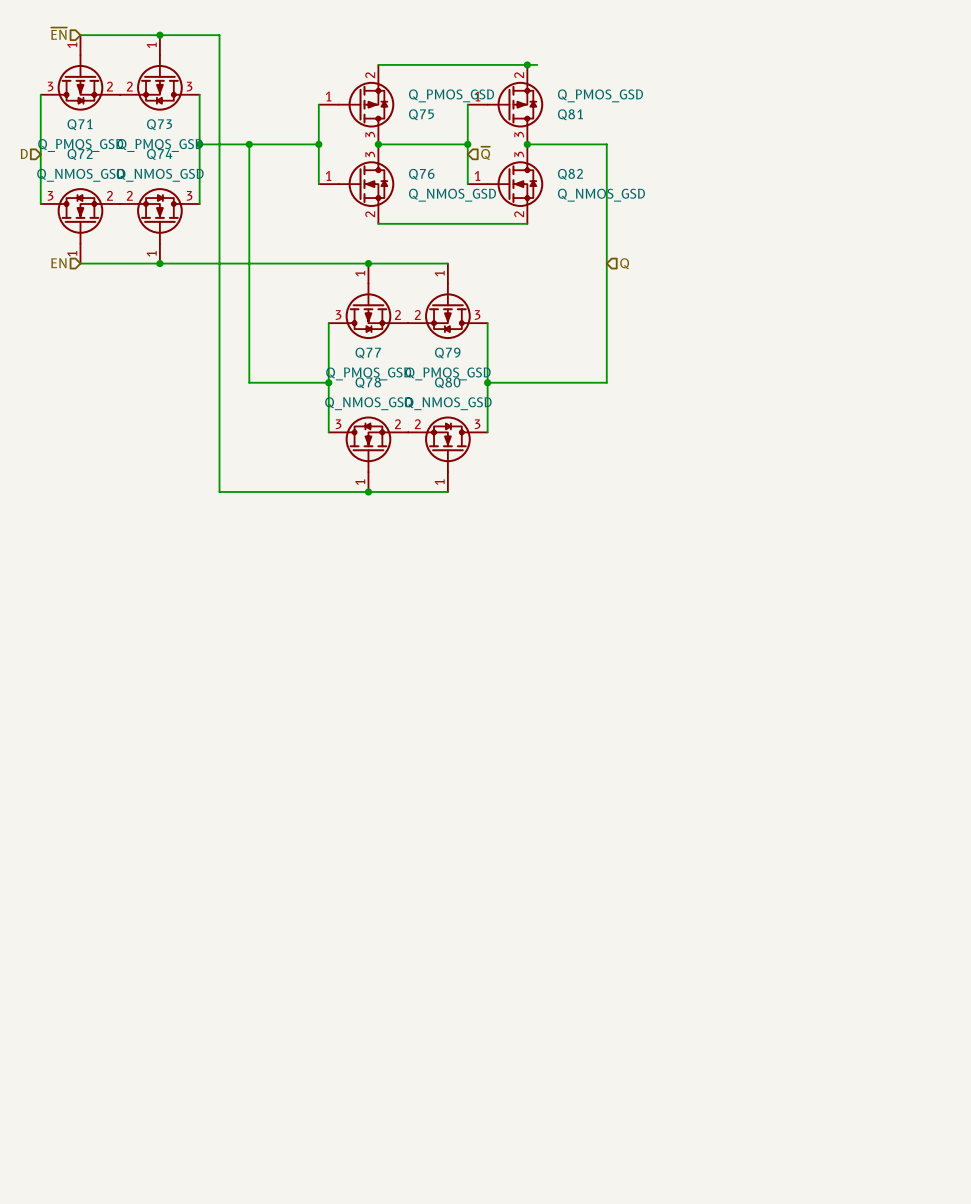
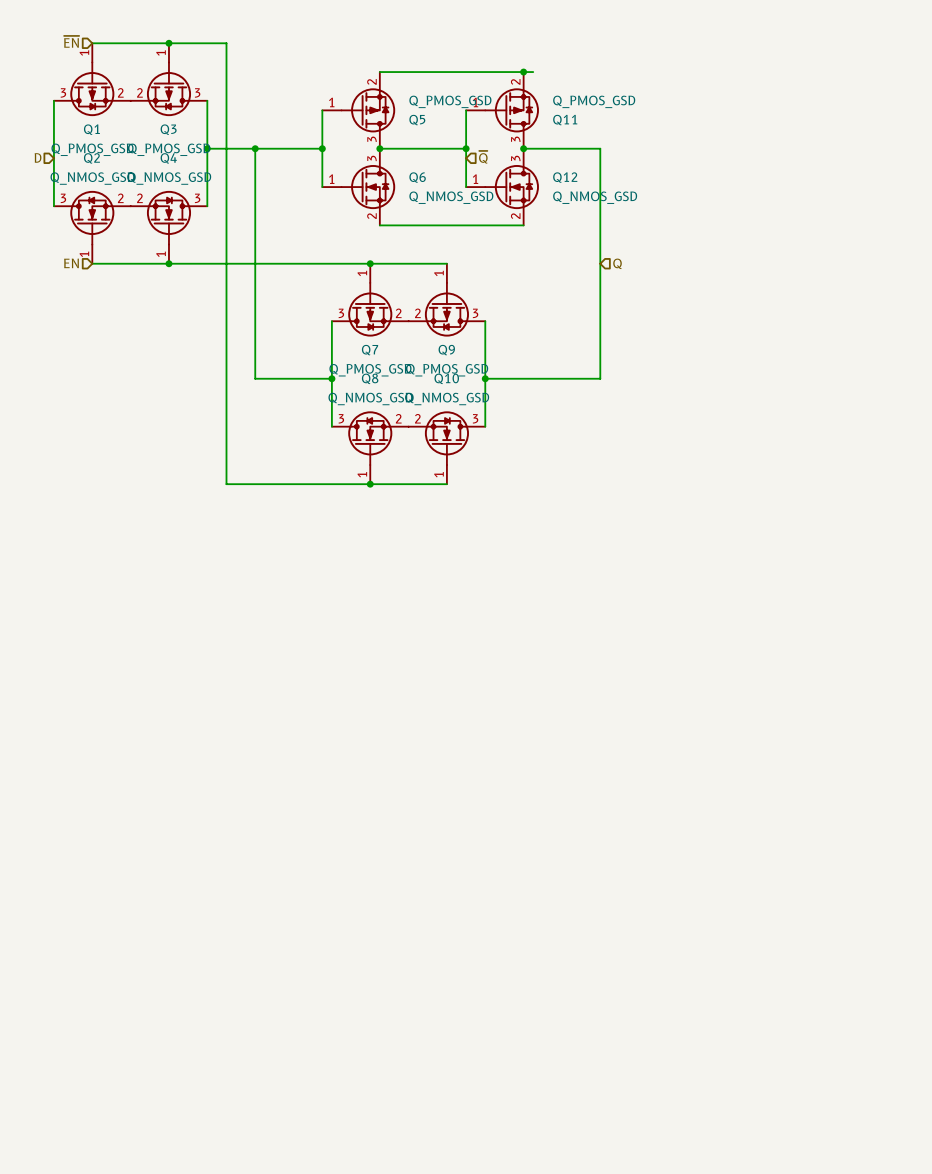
Q75 name: Q75 (421, 114) -> Q5 (417, 120)
Q81 name: Q81 (570, 114) -> Q11 (565, 120)
Q71 name: Q71 (80, 124) -> Q1 (91, 129)
Q73 name: Q73 (159, 124) -> Q3 (168, 129)
Q72 name: Q72 (80, 154) -> Q2 (91, 158)
Q74 name: Q74 (159, 154) -> Q4 (168, 158)
Q76 name: Q76 (421, 174) -> Q6 (417, 177)
Q82 name: Q82 (570, 174) -> Q12 (565, 177)
Q77 name: Q77 (368, 353) -> Q7 (370, 350)
Q79 name: Q79 (447, 353) -> Q9 (446, 350)
Q78 name: Q78 (368, 382) -> Q8 (370, 378)
Q80 name: Q80 (447, 382) -> Q10 (446, 378)

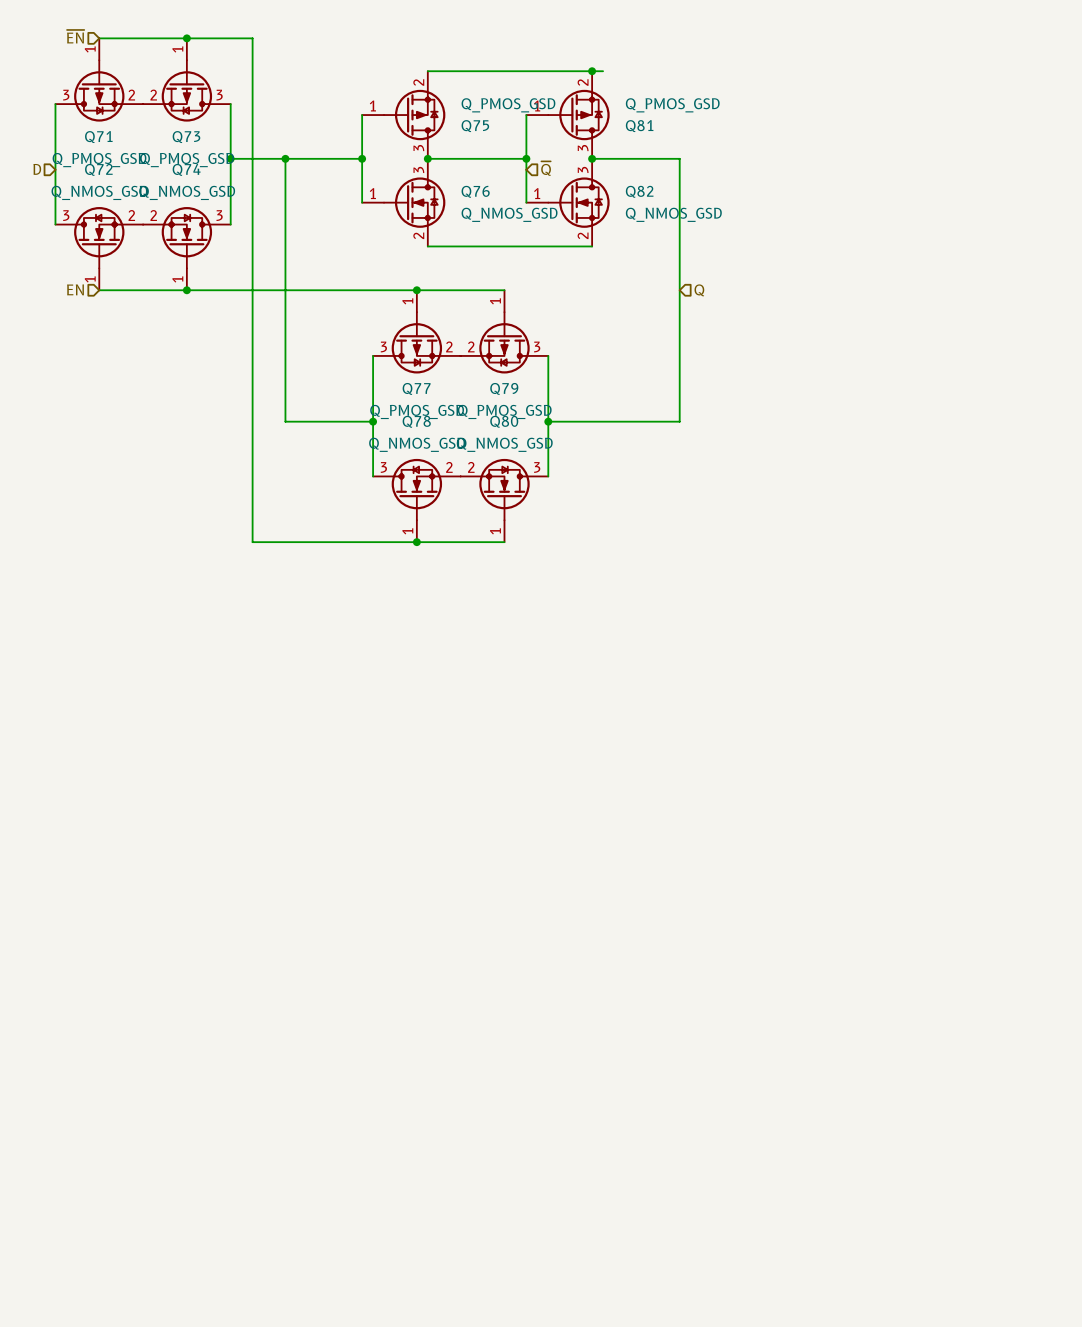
Q5 name: Q5 (417, 120) -> Q75 (475, 126)
Q11 name: Q11 (565, 120) -> Q81 (639, 126)
Q1 name: Q1 (91, 129) -> Q71 (98, 137)
Q3 name: Q3 (168, 129) -> Q73 (186, 137)
Q2 name: Q2 (91, 158) -> Q72 (98, 169)
Q4 name: Q4 (168, 158) -> Q74 (186, 169)
Q6 name: Q6 (417, 177) -> Q76 (475, 191)
Q12 name: Q12 (565, 177) -> Q82 (639, 191)
Q7 name: Q7 (370, 350) -> Q77 (416, 388)
Q9 name: Q9 (446, 350) -> Q79 (504, 388)
Q8 name: Q8 (370, 378) -> Q78 (416, 421)
Q10 name: Q10 (446, 378) -> Q80 (504, 421)

